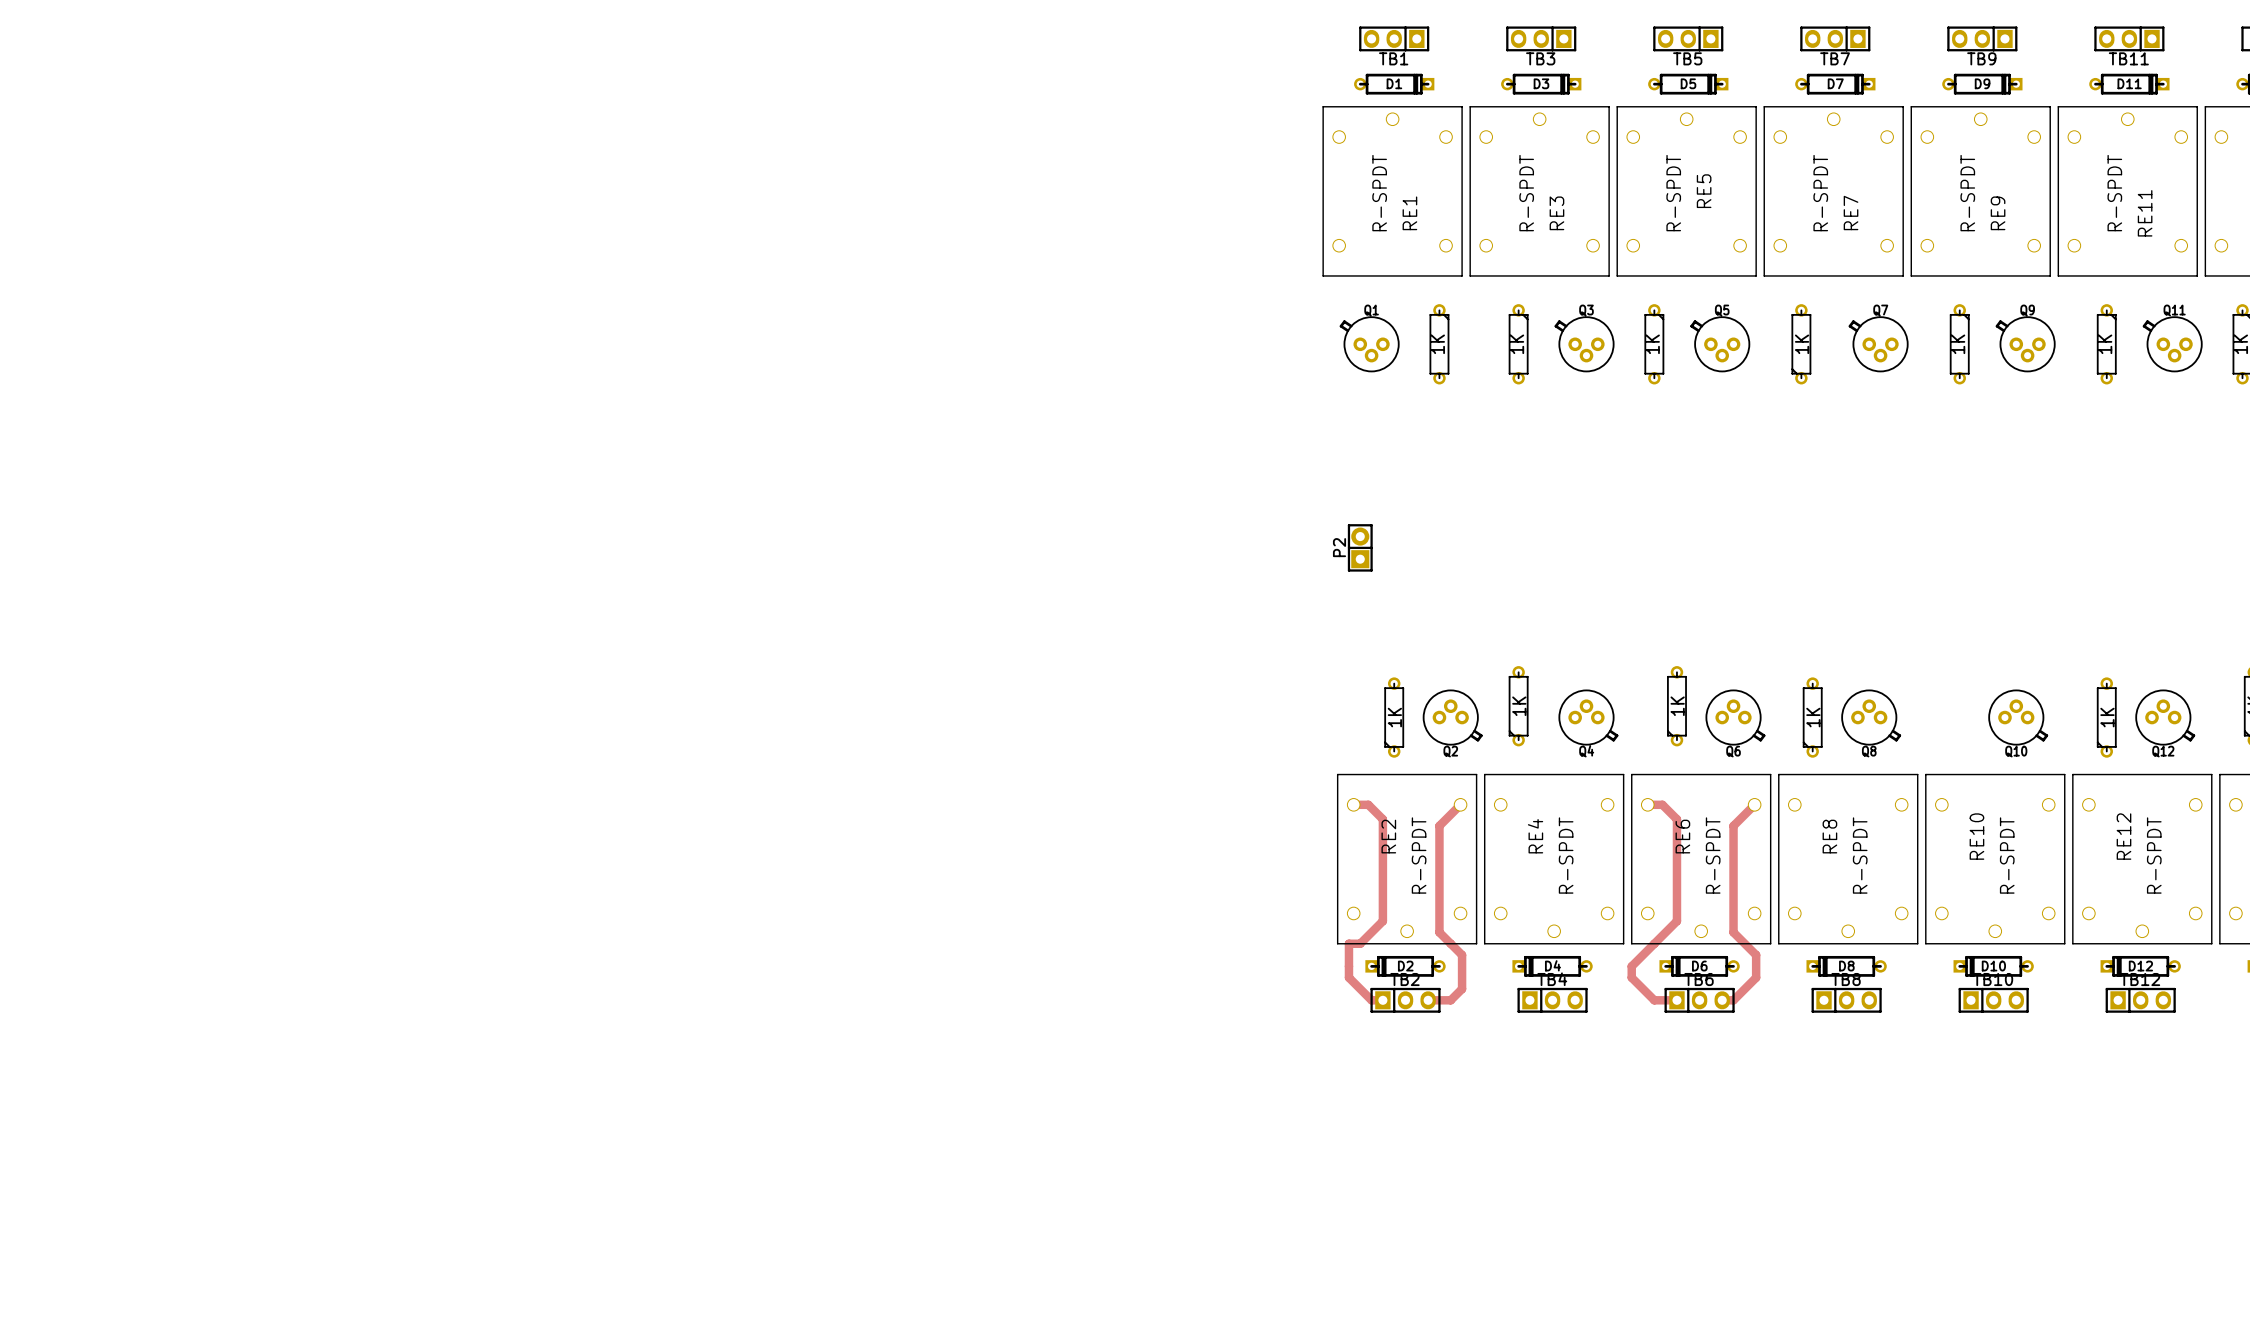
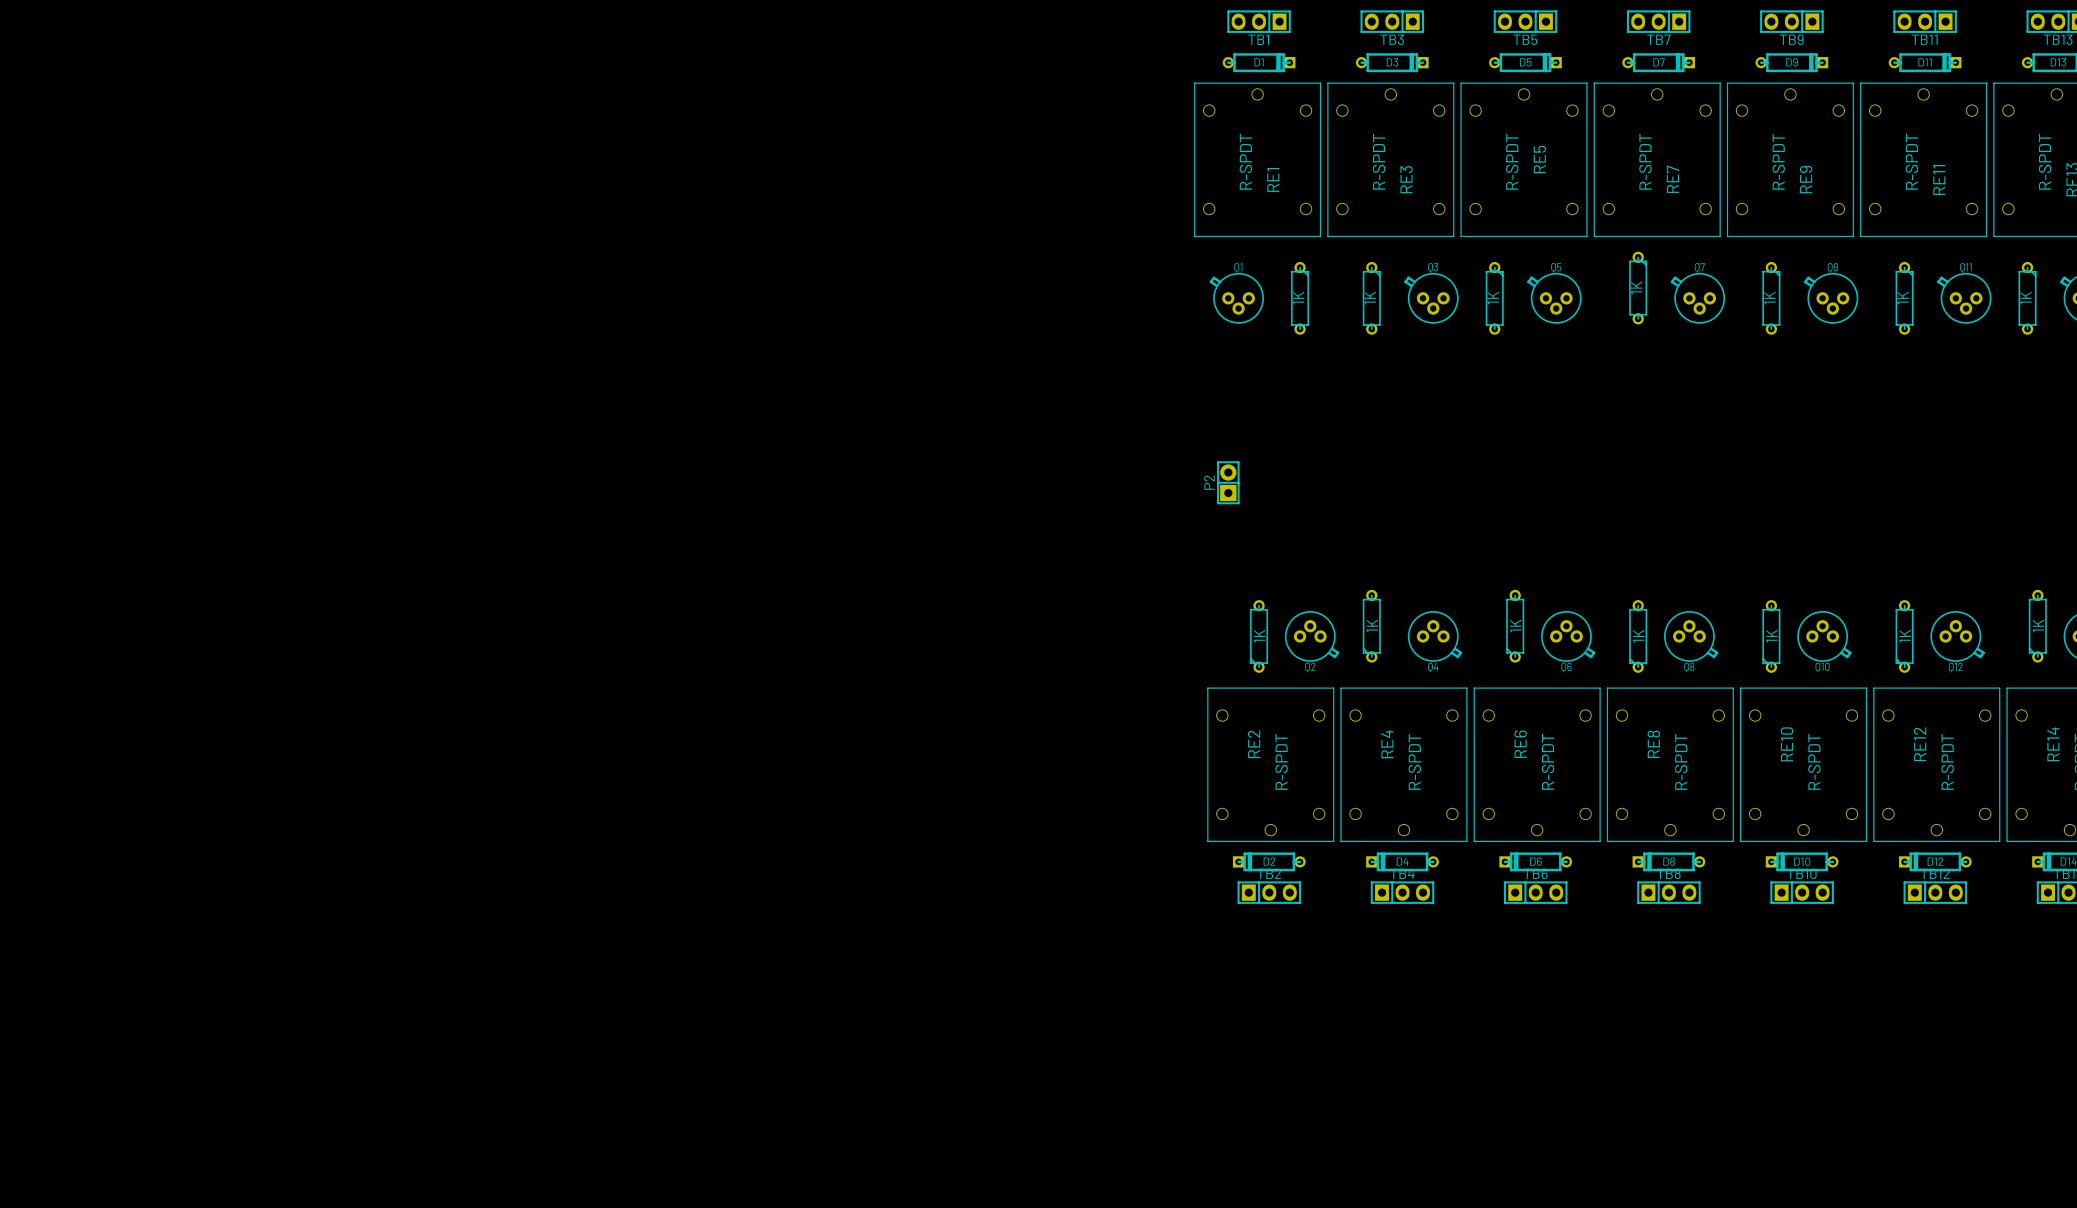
part rotation: 0° (1801, 344) -> 180° (1638, 288)
part: none -> 1K (1771, 636)
track: (1353, 804) (1368, 804) (1382, 819) (1382, 921) (1360, 943) (1348, 943) (1348, 977) (1371, 1000) (1382, 1000) -> none
track: (1460, 804) (1439, 825) (1439, 932) (1462, 955) (1462, 988) (1450, 1000) (1428, 1000) -> none
track: (1647, 804) (1662, 804) (1676, 819) (1676, 921) (1631, 966) (1631, 977) (1654, 1000) (1676, 1000) -> none
track: (1754, 804) (1733, 825) (1733, 932) (1756, 955) (1756, 977) (1733, 1000) (1722, 1000) -> none

